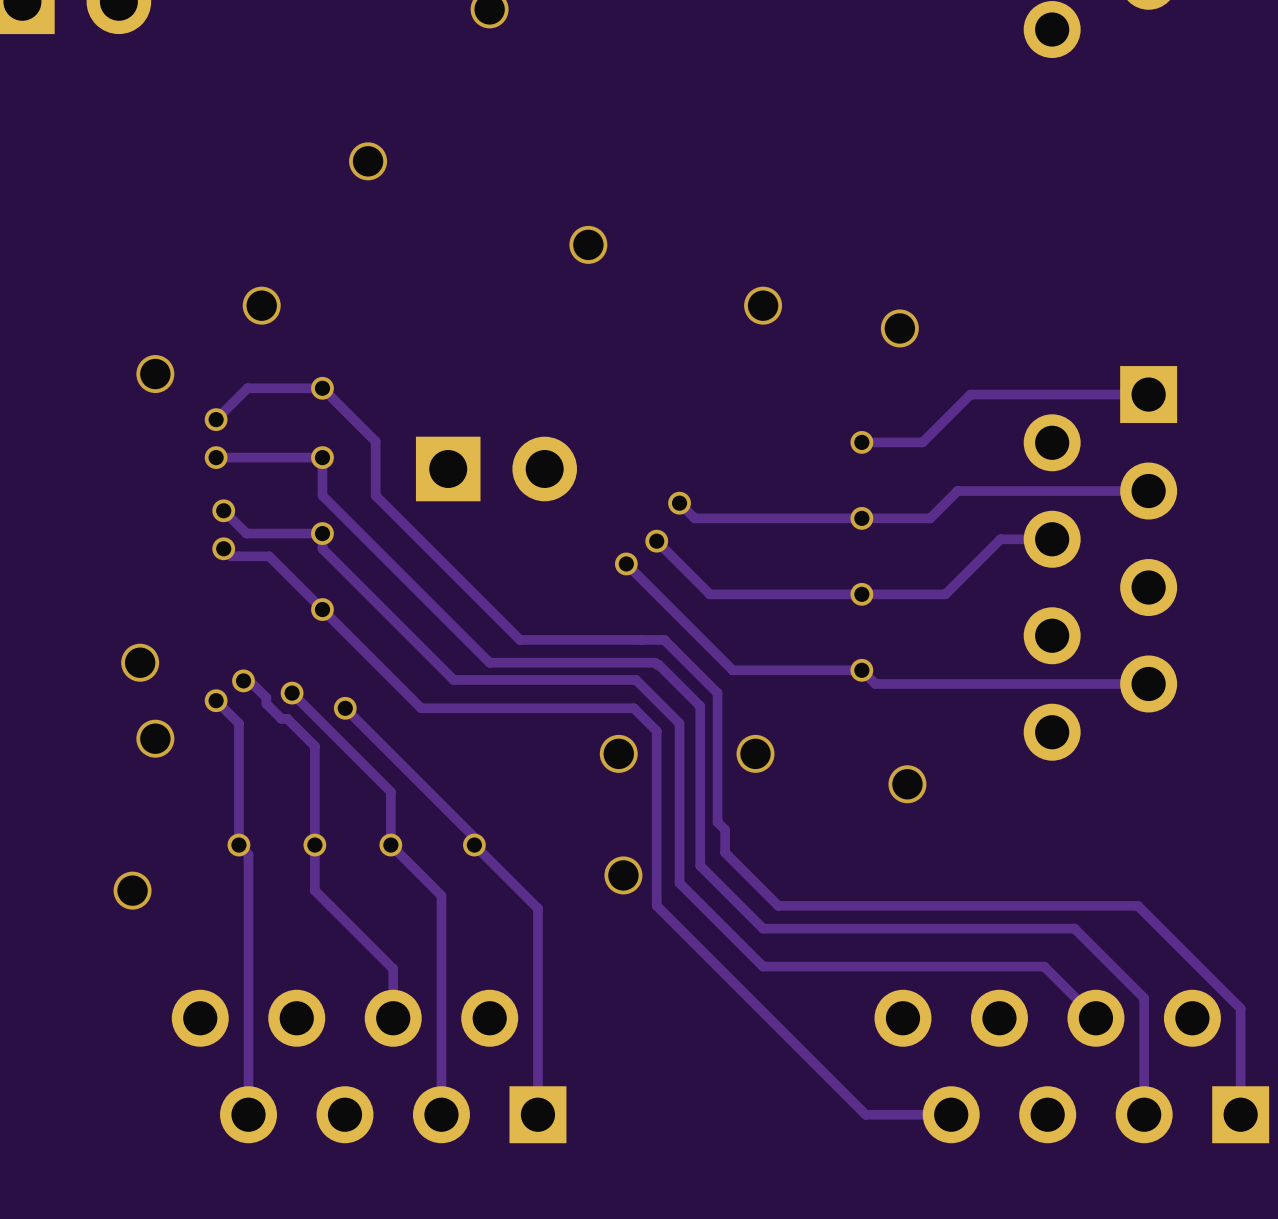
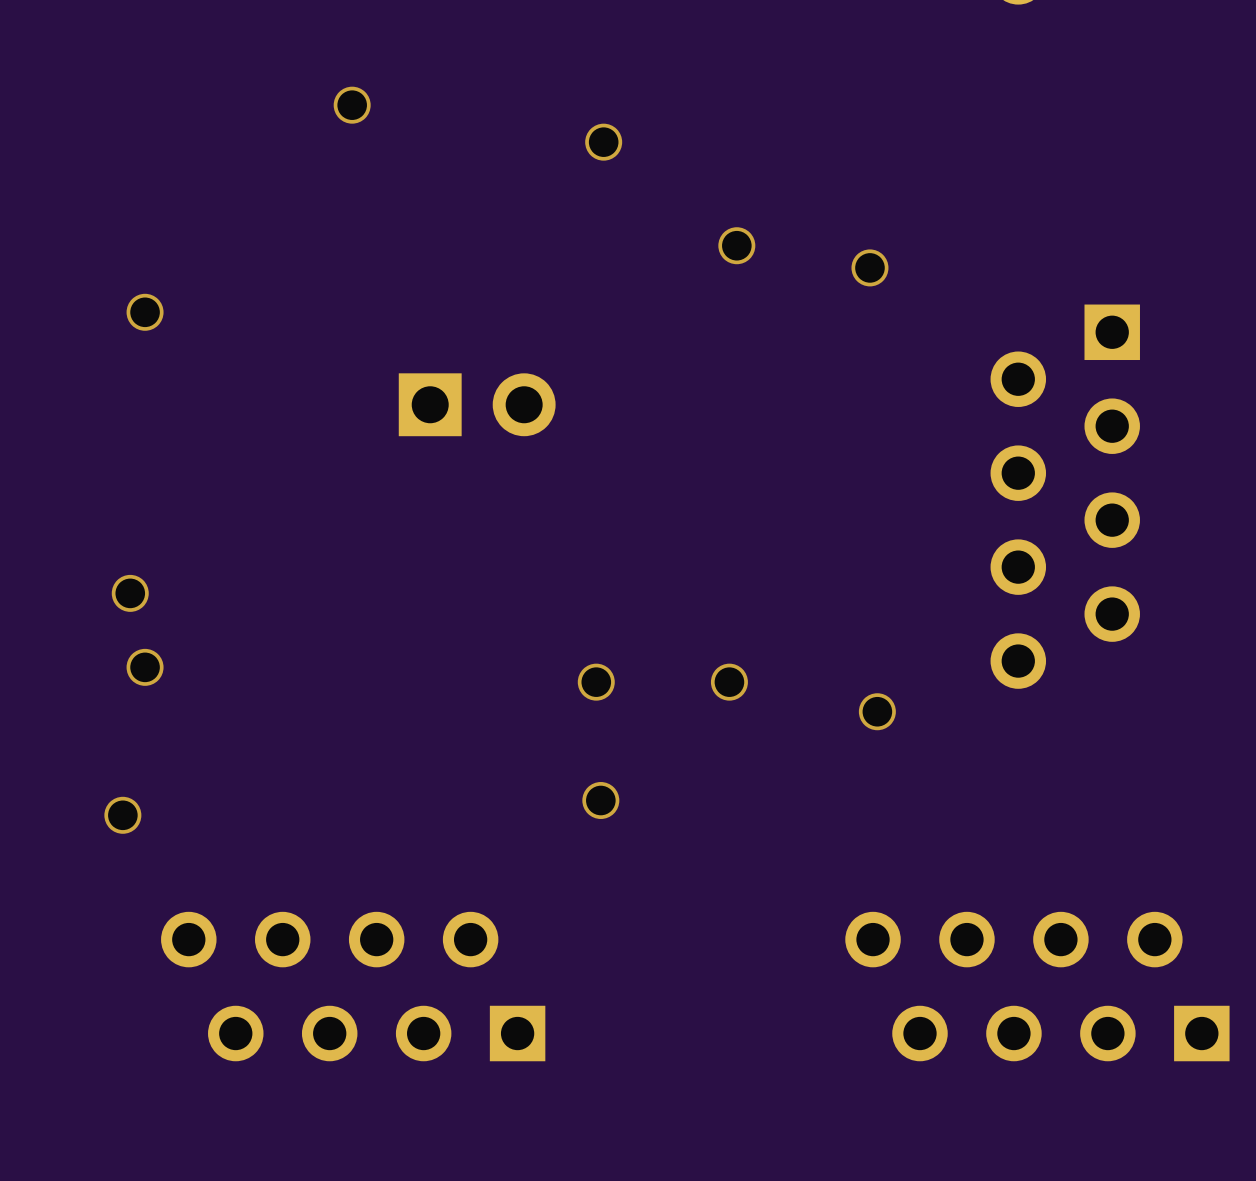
via position: (588, 244) -> (603, 142)
via: (261, 305) -> none
via: (322, 388) -> none
track: (1148, 394) (970, 394) (922, 442) (861, 442) -> none
track: (216, 419) (247, 388) (322, 388) (375, 441) (375, 495) (520, 639) (664, 639) (717, 693) (717, 822) (725, 829) (725, 852) (778, 905) (1137, 905) (1240, 1008) (1240, 1114) -> none
via: (216, 419) -> none
via: (861, 442) -> none
track: (216, 457) (322, 457) (322, 495) (489, 662) (655, 662) (658, 664) (700, 706) (700, 865) (763, 928) (1074, 928) (1144, 998) (1144, 1114) -> none
via: (216, 457) -> none
via: (322, 457) -> none
track: (1148, 491) (957, 491) (930, 518) (694, 518) (679, 503) -> none
via: (679, 503) -> none
track: (223, 510) (246, 533) (322, 533) (322, 548) (453, 679) (636, 679) (679, 723) (679, 883) (763, 966) (1044, 966) (1095, 1018) -> none
via: (223, 510) -> none
via: (861, 518) -> none
via: (322, 533) -> none
track: (1052, 539) (1000, 539) (945, 594) (709, 594) (656, 541) -> none
via: (656, 541) -> none
track: (223, 548) (231, 556) (269, 556) (421, 708) (633, 708) (656, 731) (656, 905) (865, 1114) (951, 1114) -> none
via: (223, 548) -> none
track: (626, 563) (732, 670) (861, 670) (875, 683) (1148, 683) -> none
via: (626, 563) -> none
via: (861, 594) -> none
via: (322, 609) -> none
via: (861, 670) -> none
track: (243, 680) (249, 680) (266, 697) (266, 703) (281, 718) (287, 718) (314, 746) (314, 890) (393, 968) (393, 1018) -> none
via: (243, 680) -> none
track: (292, 693) (390, 791) (390, 845) (441, 895) (441, 1114) -> none
via: (292, 693) -> none
track: (216, 700) (238, 723) (238, 845) (248, 854) (248, 1114) -> none
via: (216, 700) -> none
track: (345, 708) (474, 837) (474, 845) (537, 908) (537, 1114) -> none
via: (345, 708) -> none
via: (238, 845) -> none
via: (314, 845) -> none
via: (390, 845) -> none
via: (474, 845) -> none

